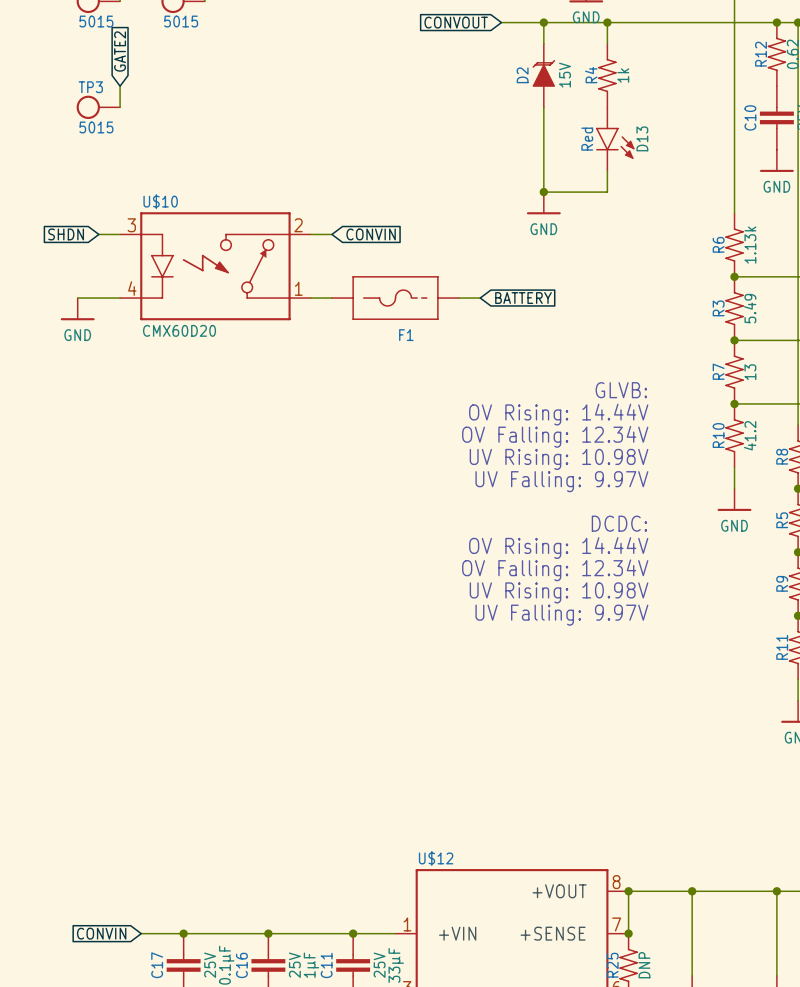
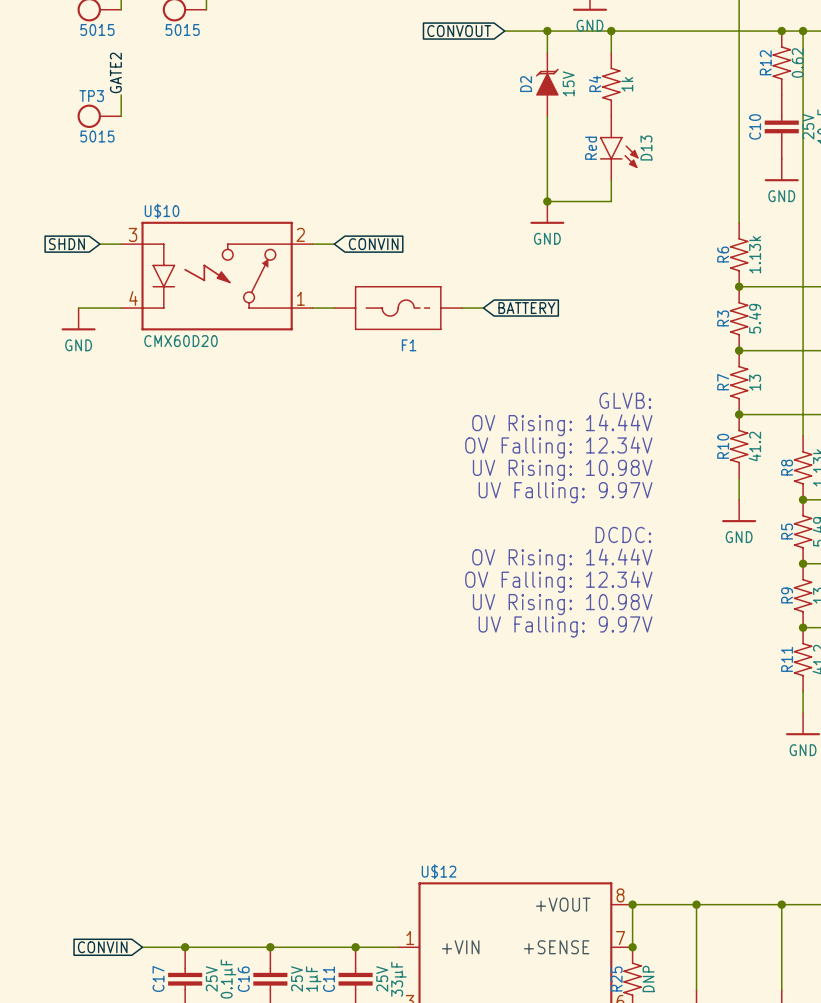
global label: GATE2 (120, 51) -> none
label: none -> GATE2 (115, 72)

